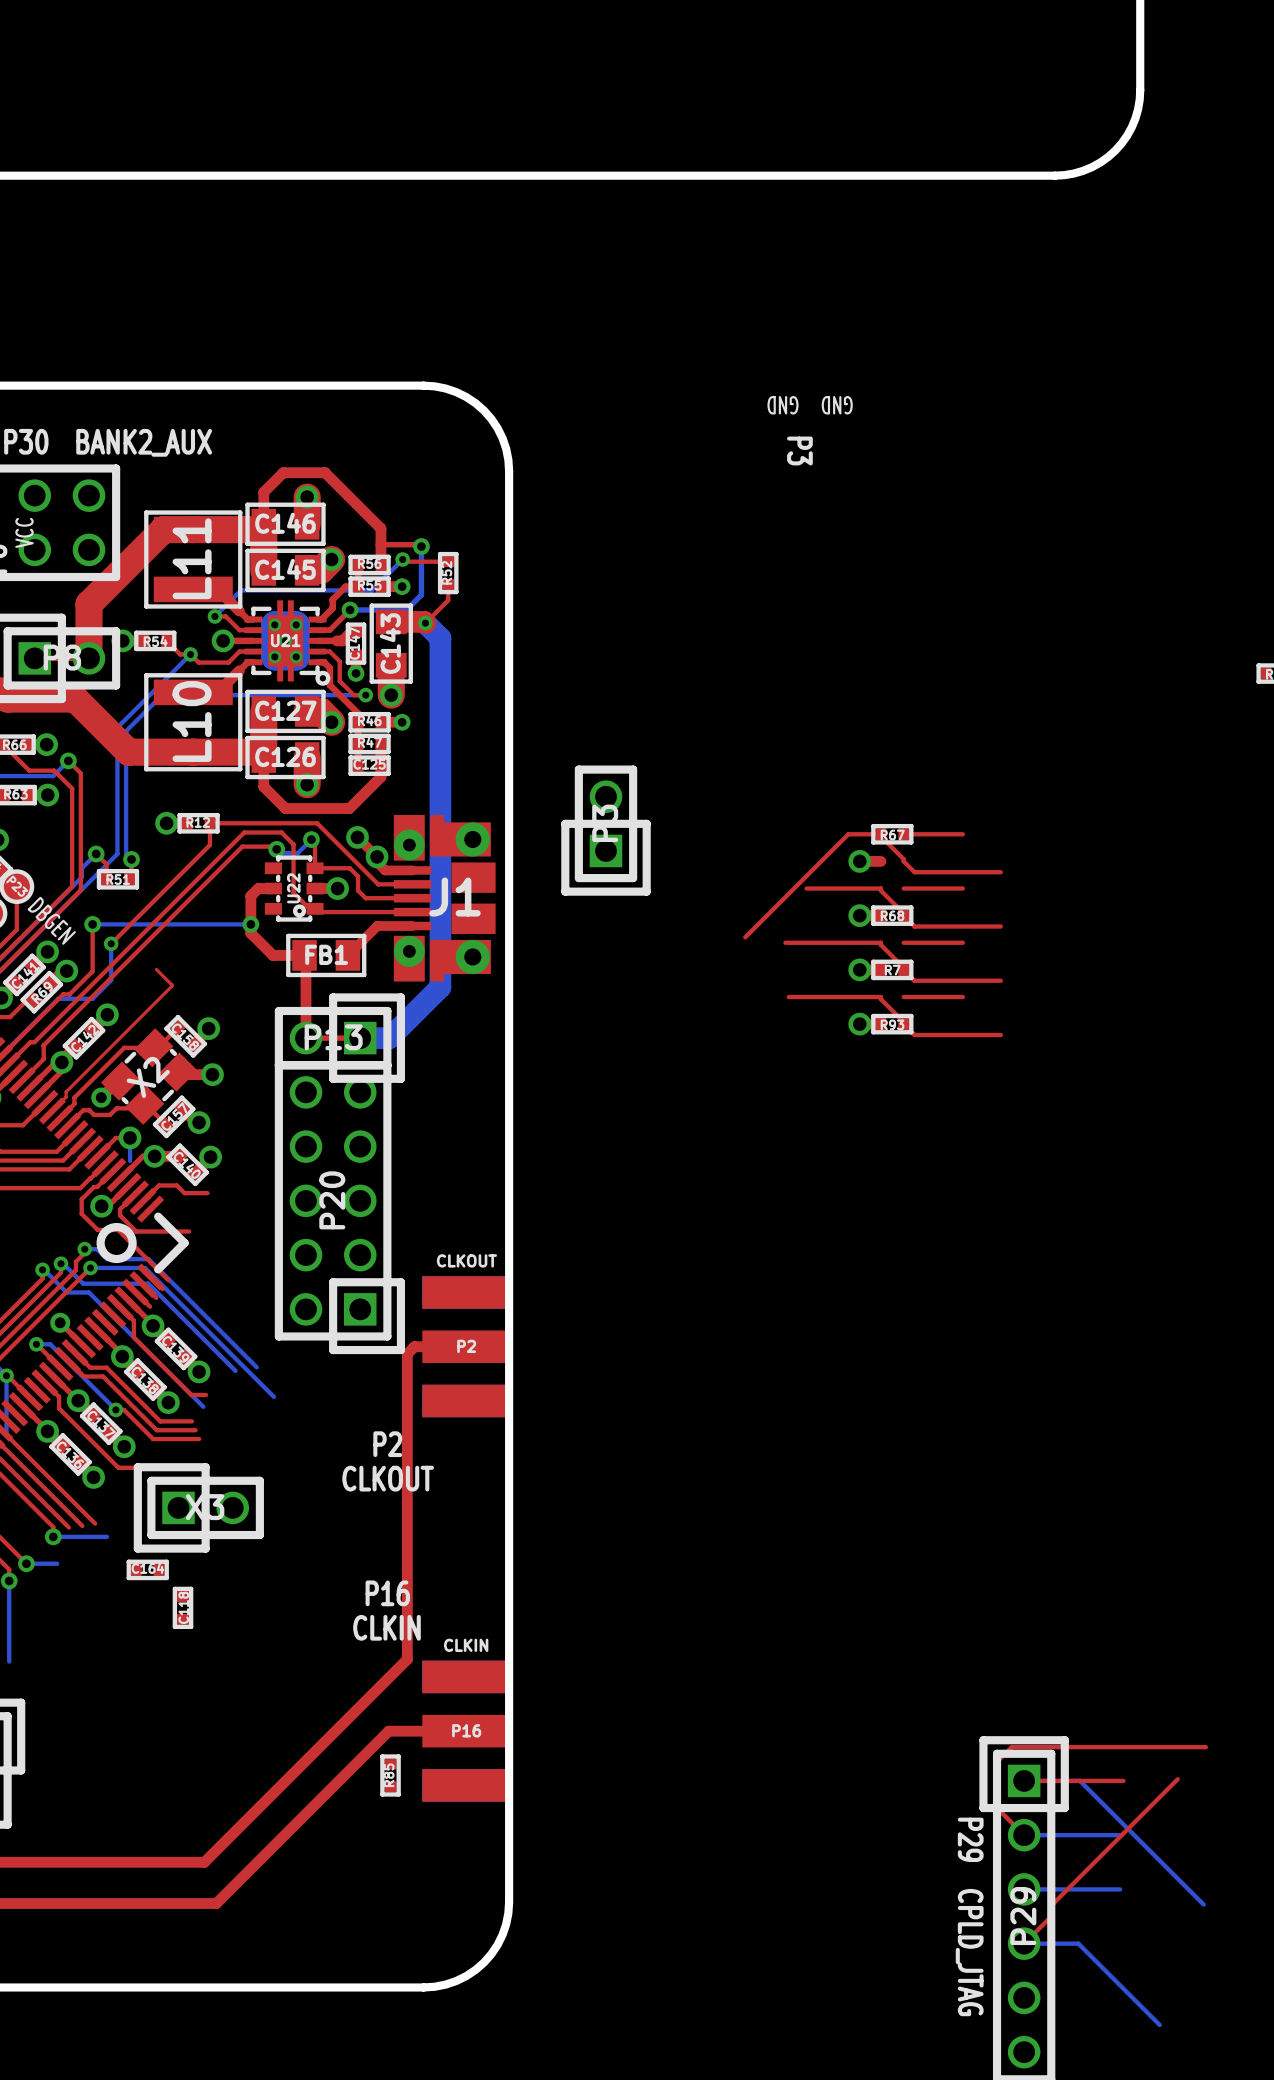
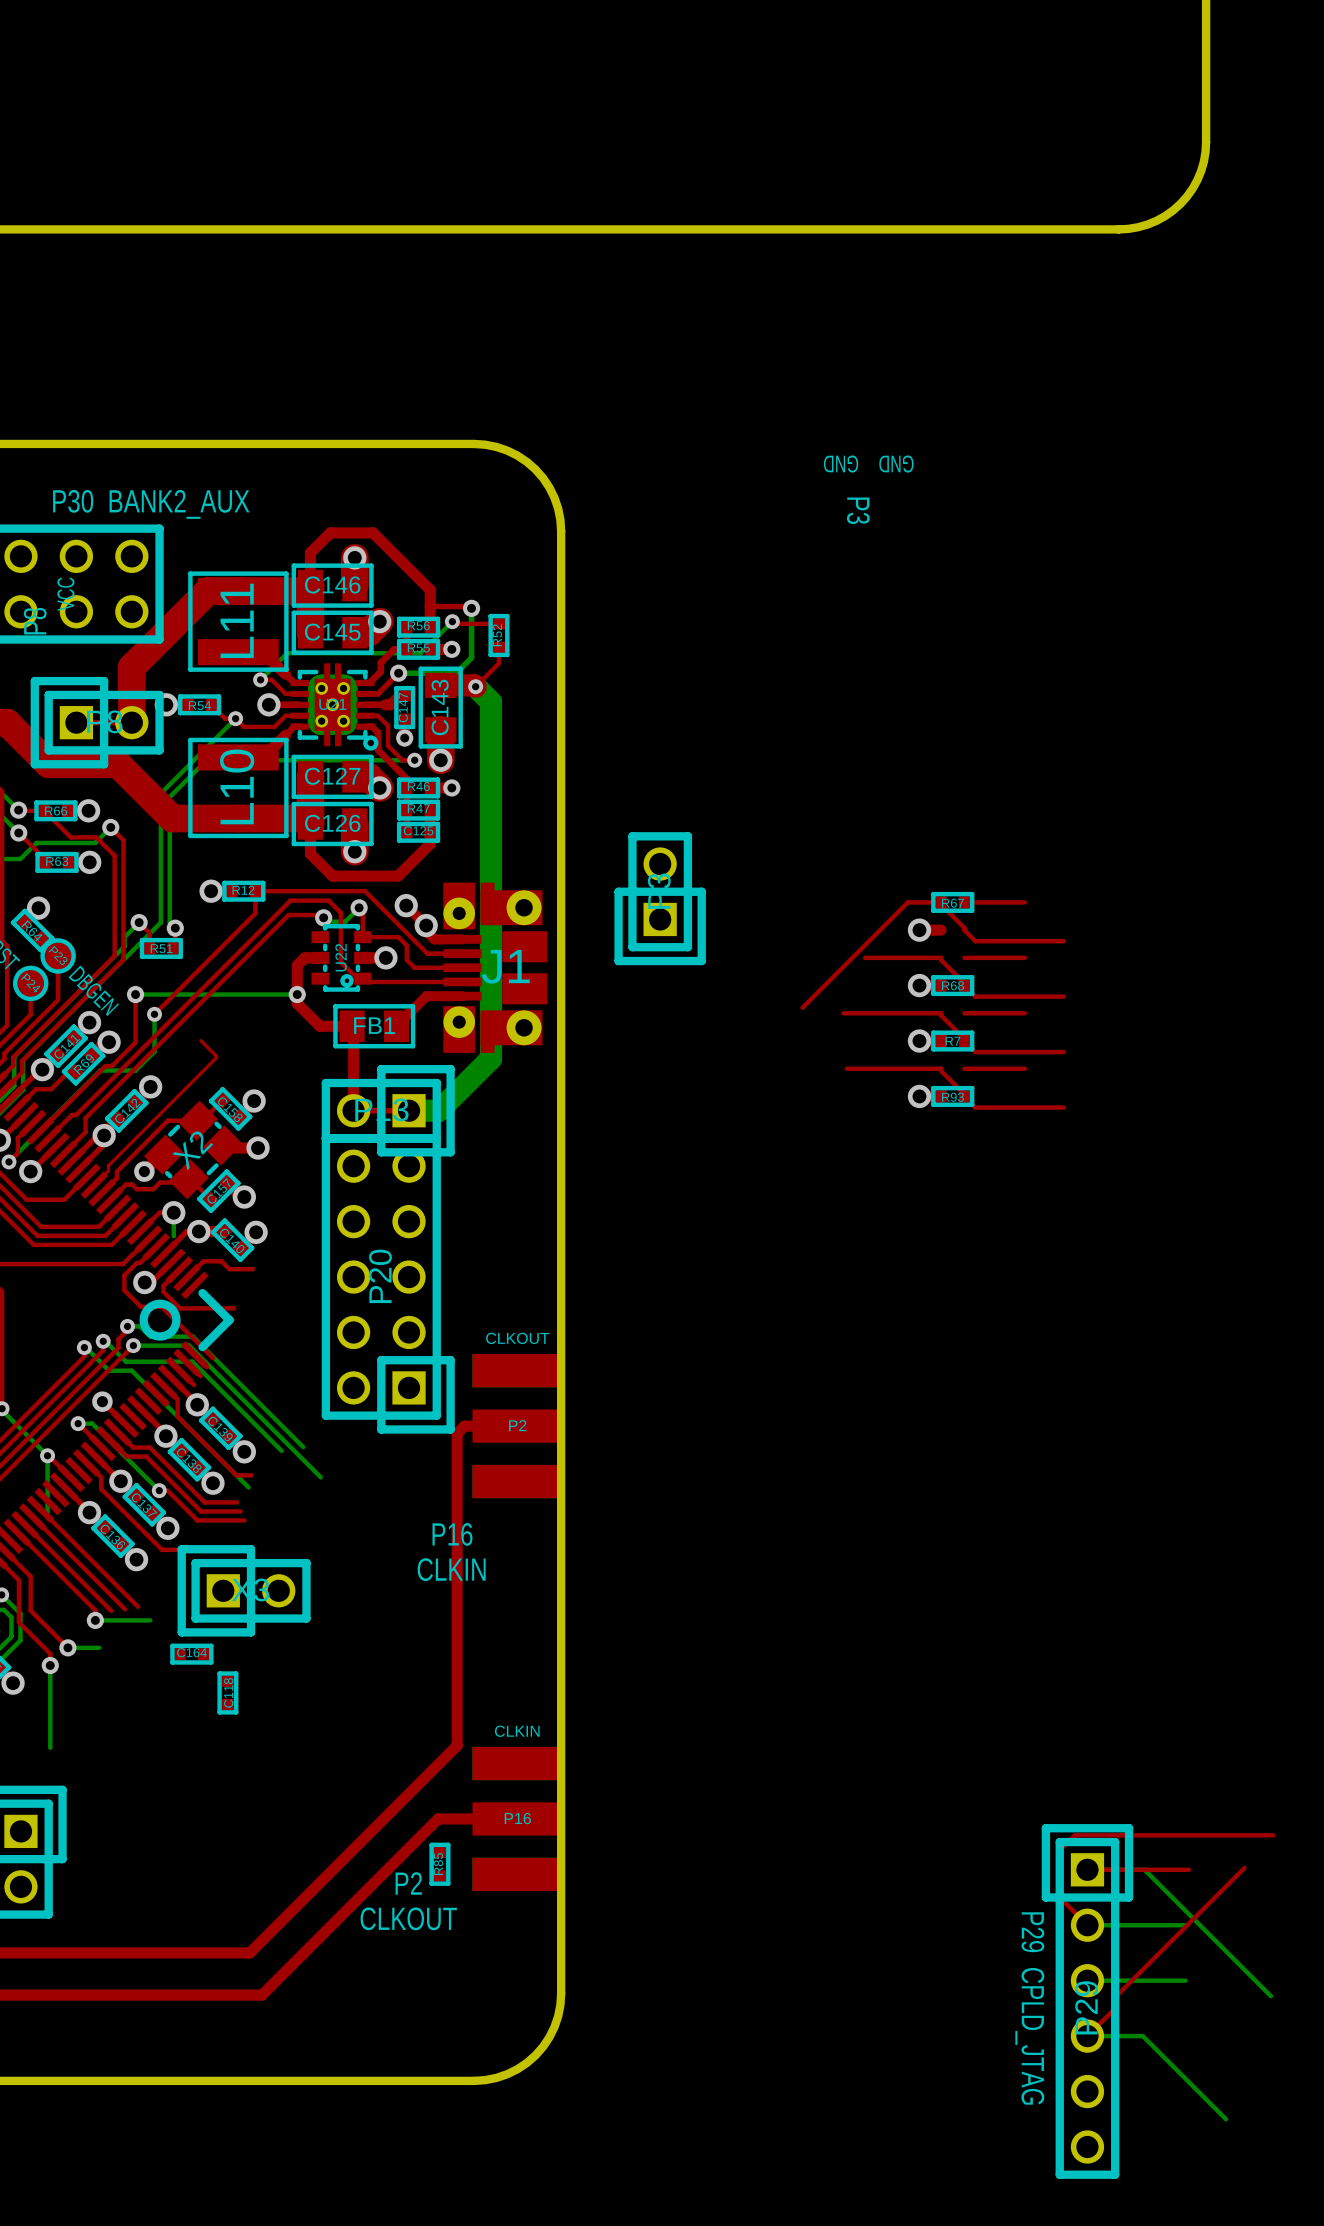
text position: P2 (387, 1444) -> P2 (408, 1883)
text position: CLKOUT (388, 1478) -> CLKOUT (408, 1918)
text position: P16 (387, 1593) -> P16 (452, 1534)
text position: CLKIN (386, 1627) -> CLKIN (451, 1569)

